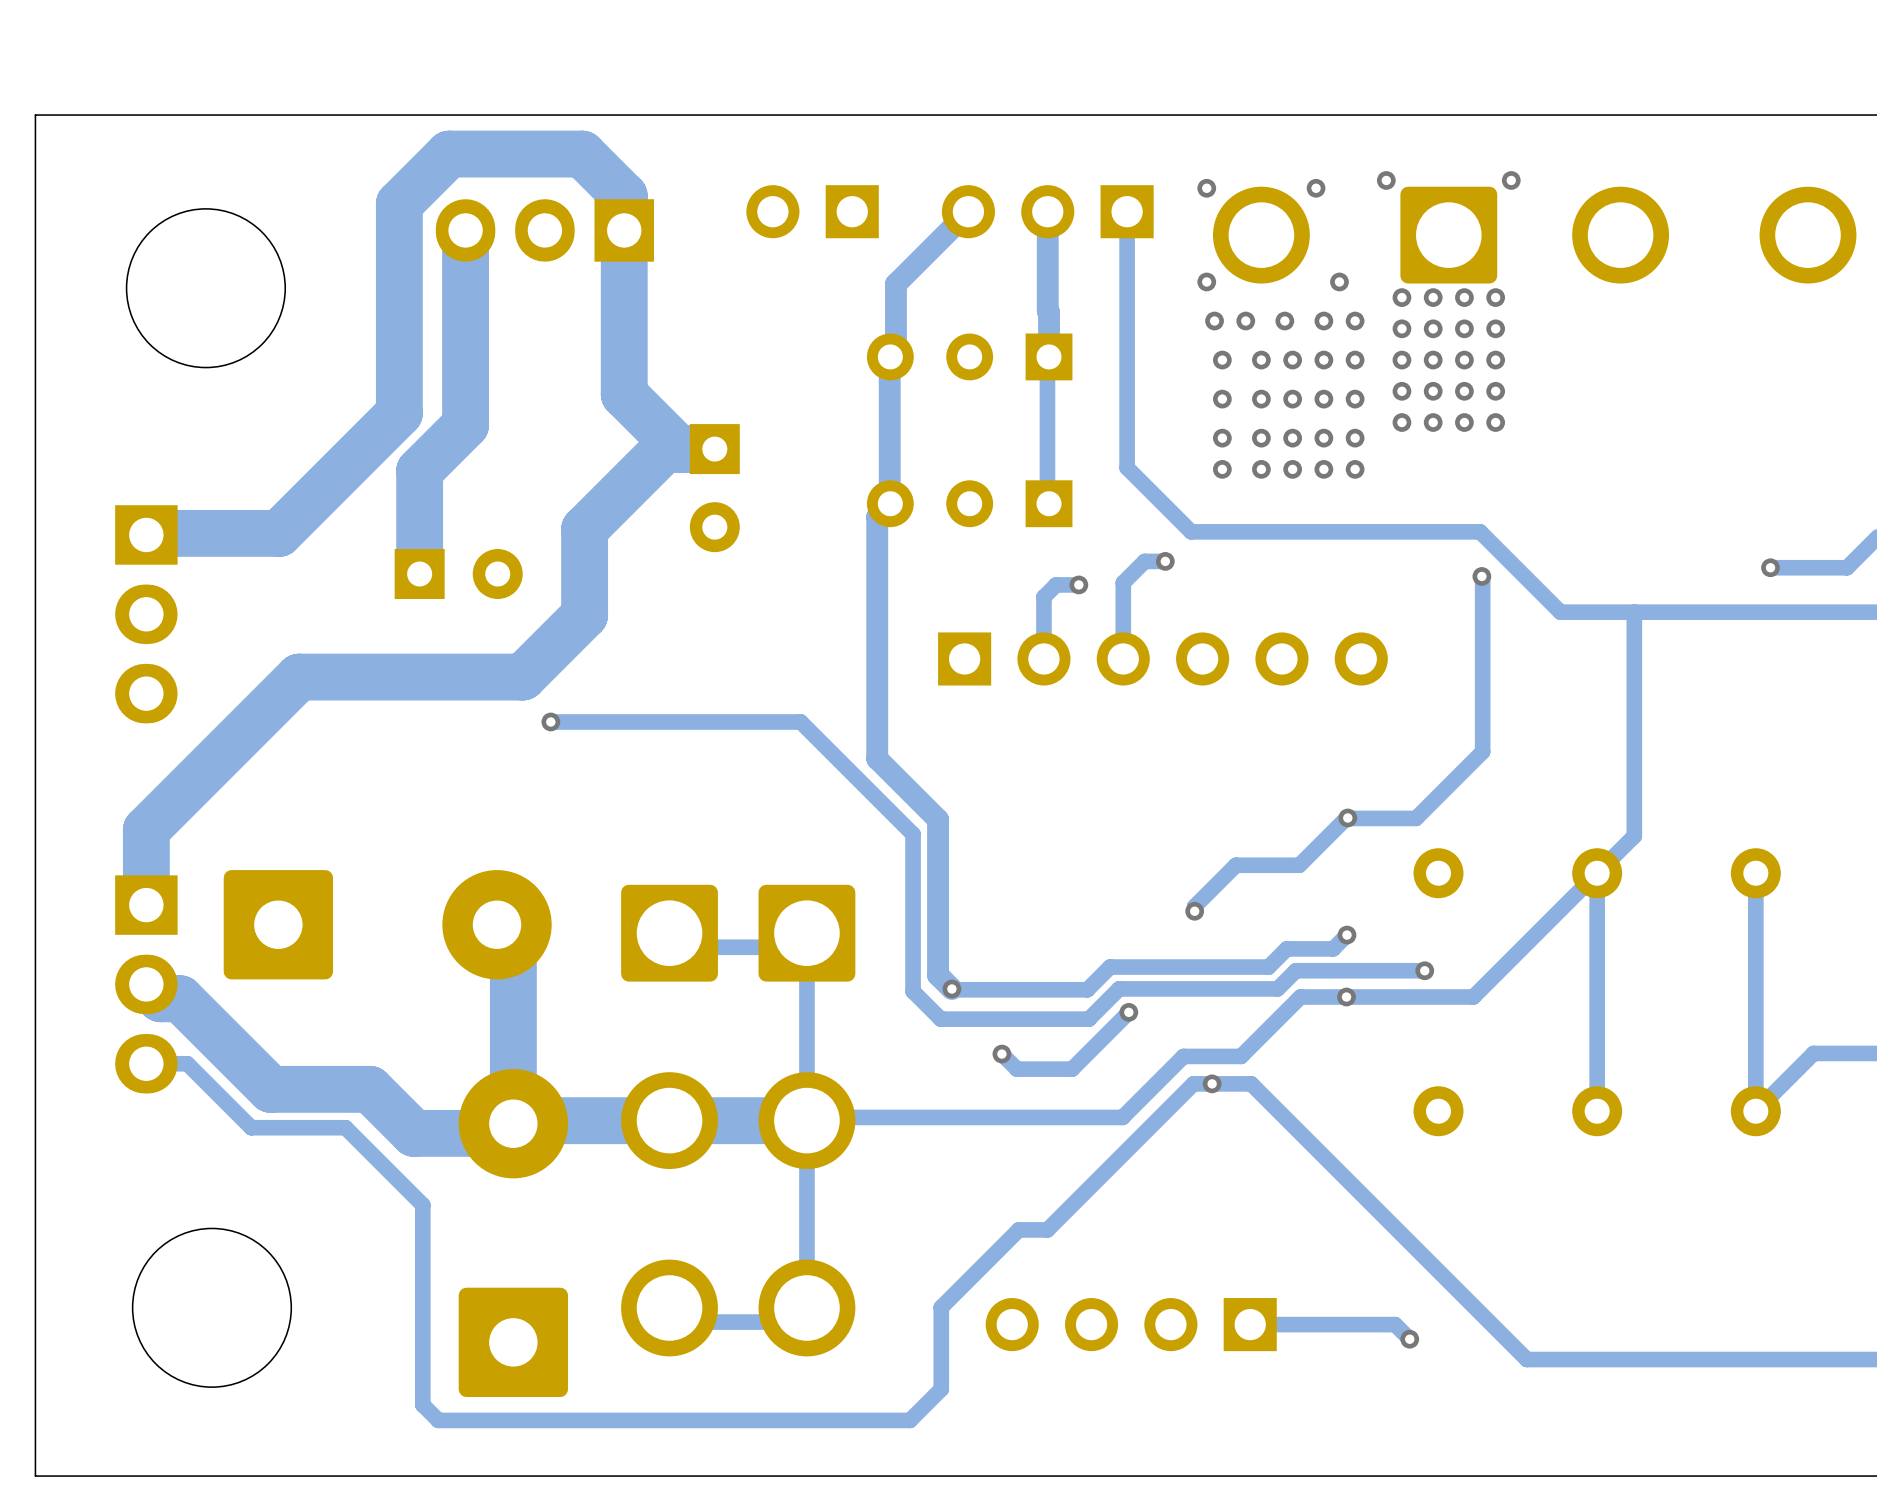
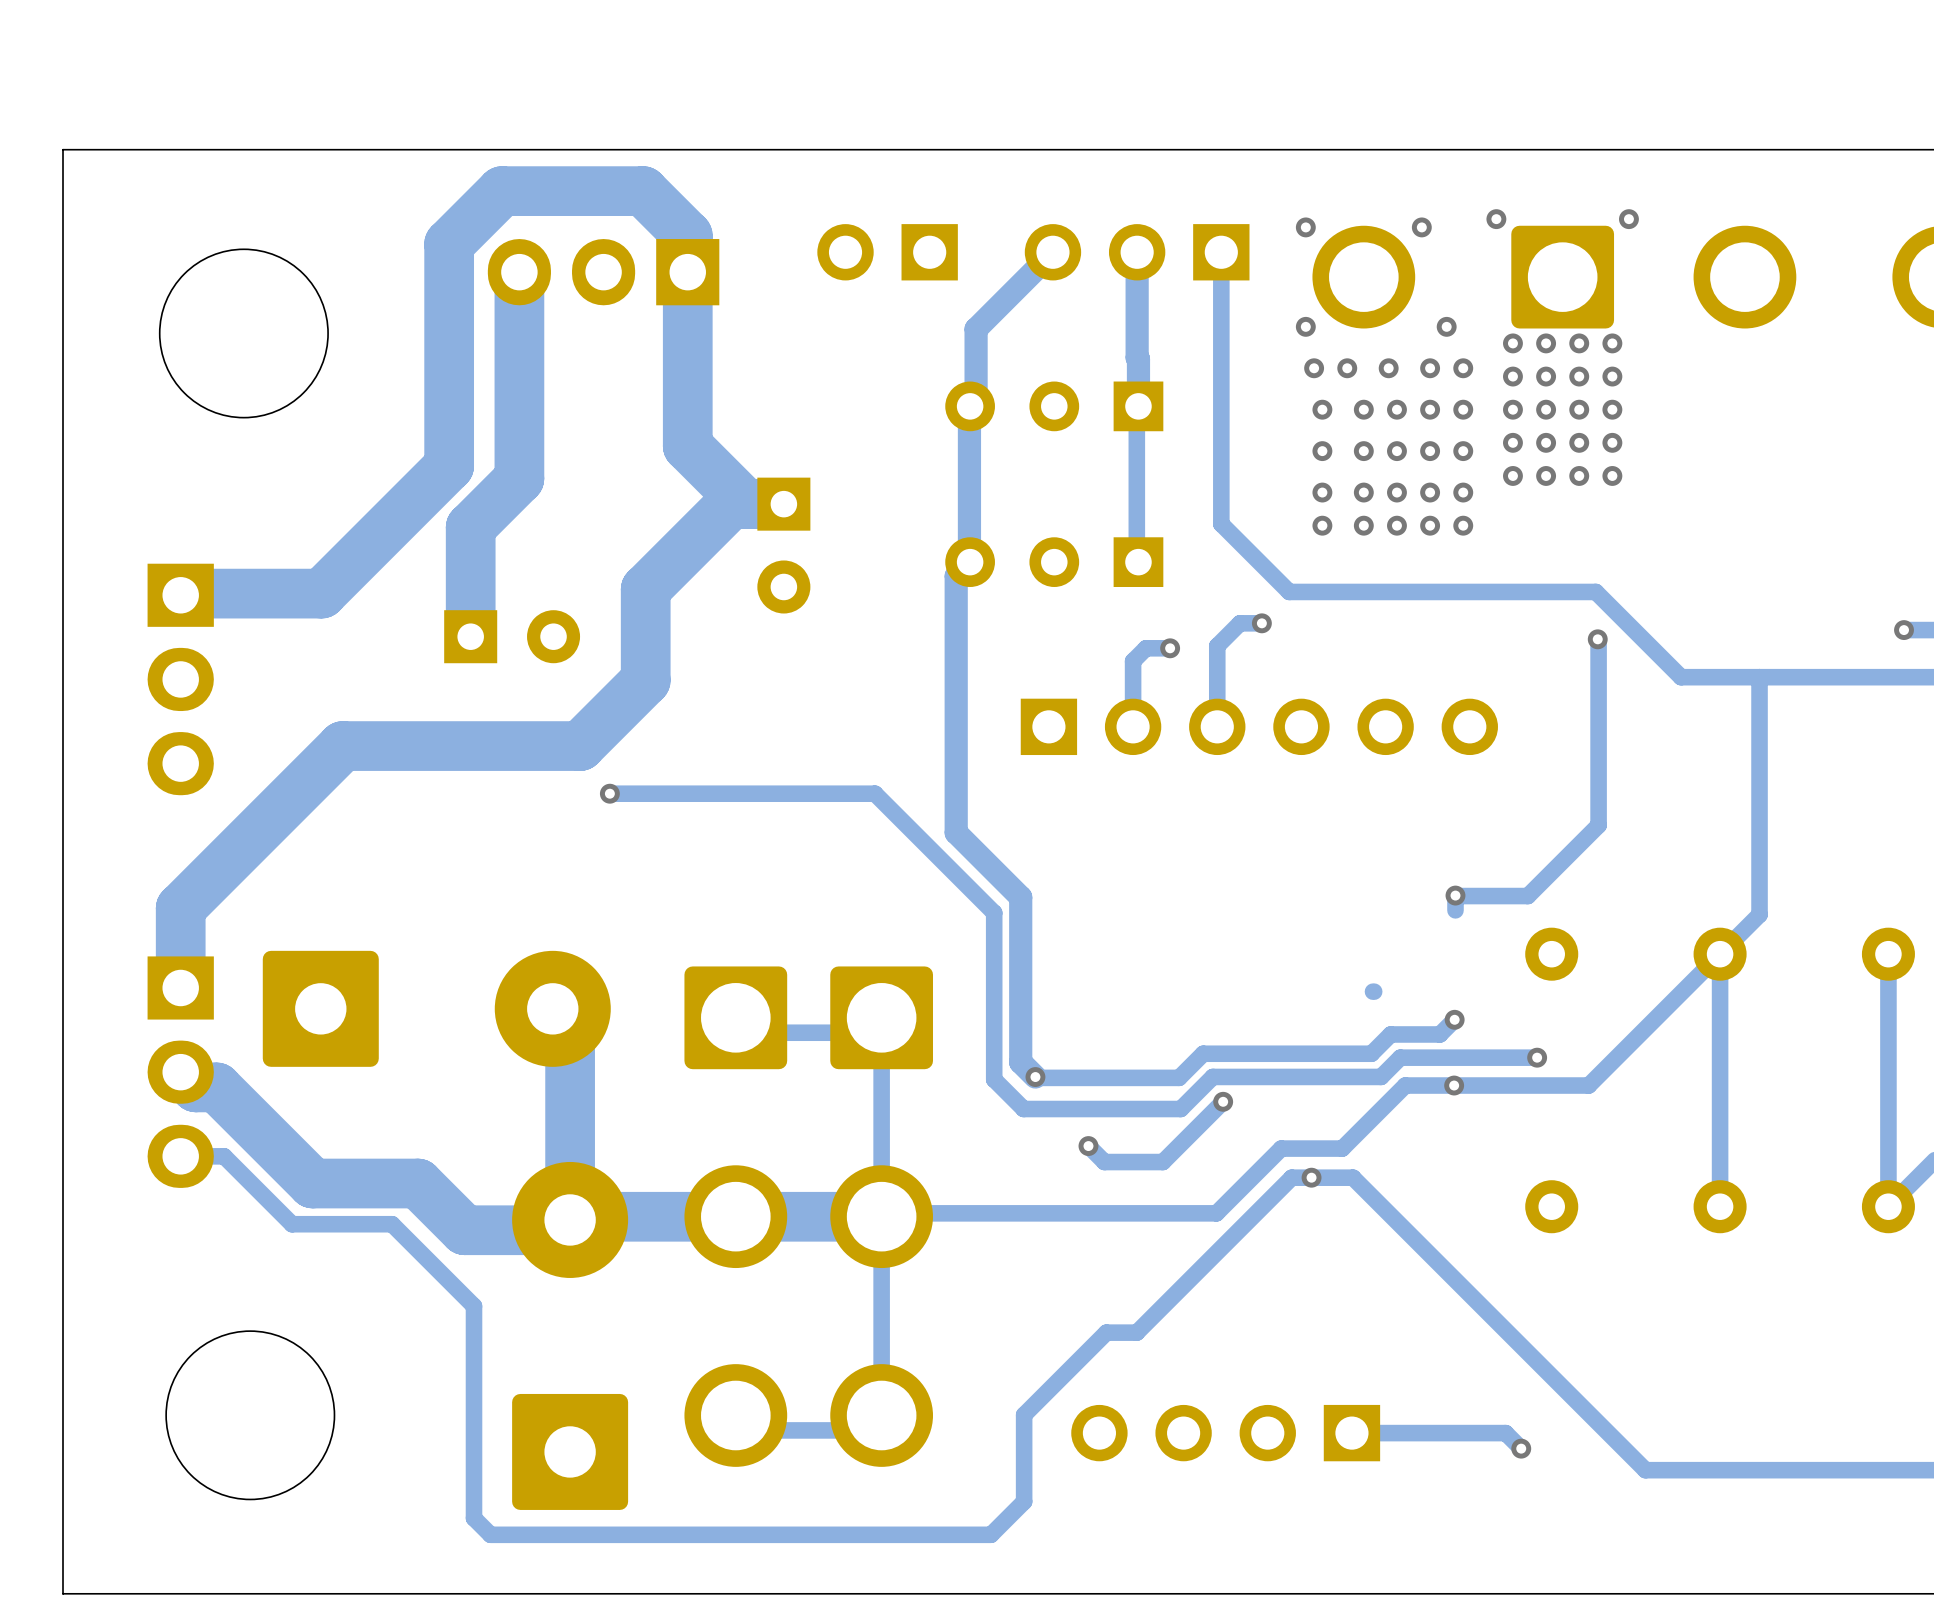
track: (1347, 817) (1299, 865) (1235, 865) (1194, 906) (1194, 911) -> (1455, 895) (1455, 910)
track: none -> (1374, 991) (1373, 991)
via: (1194, 911) -> none

